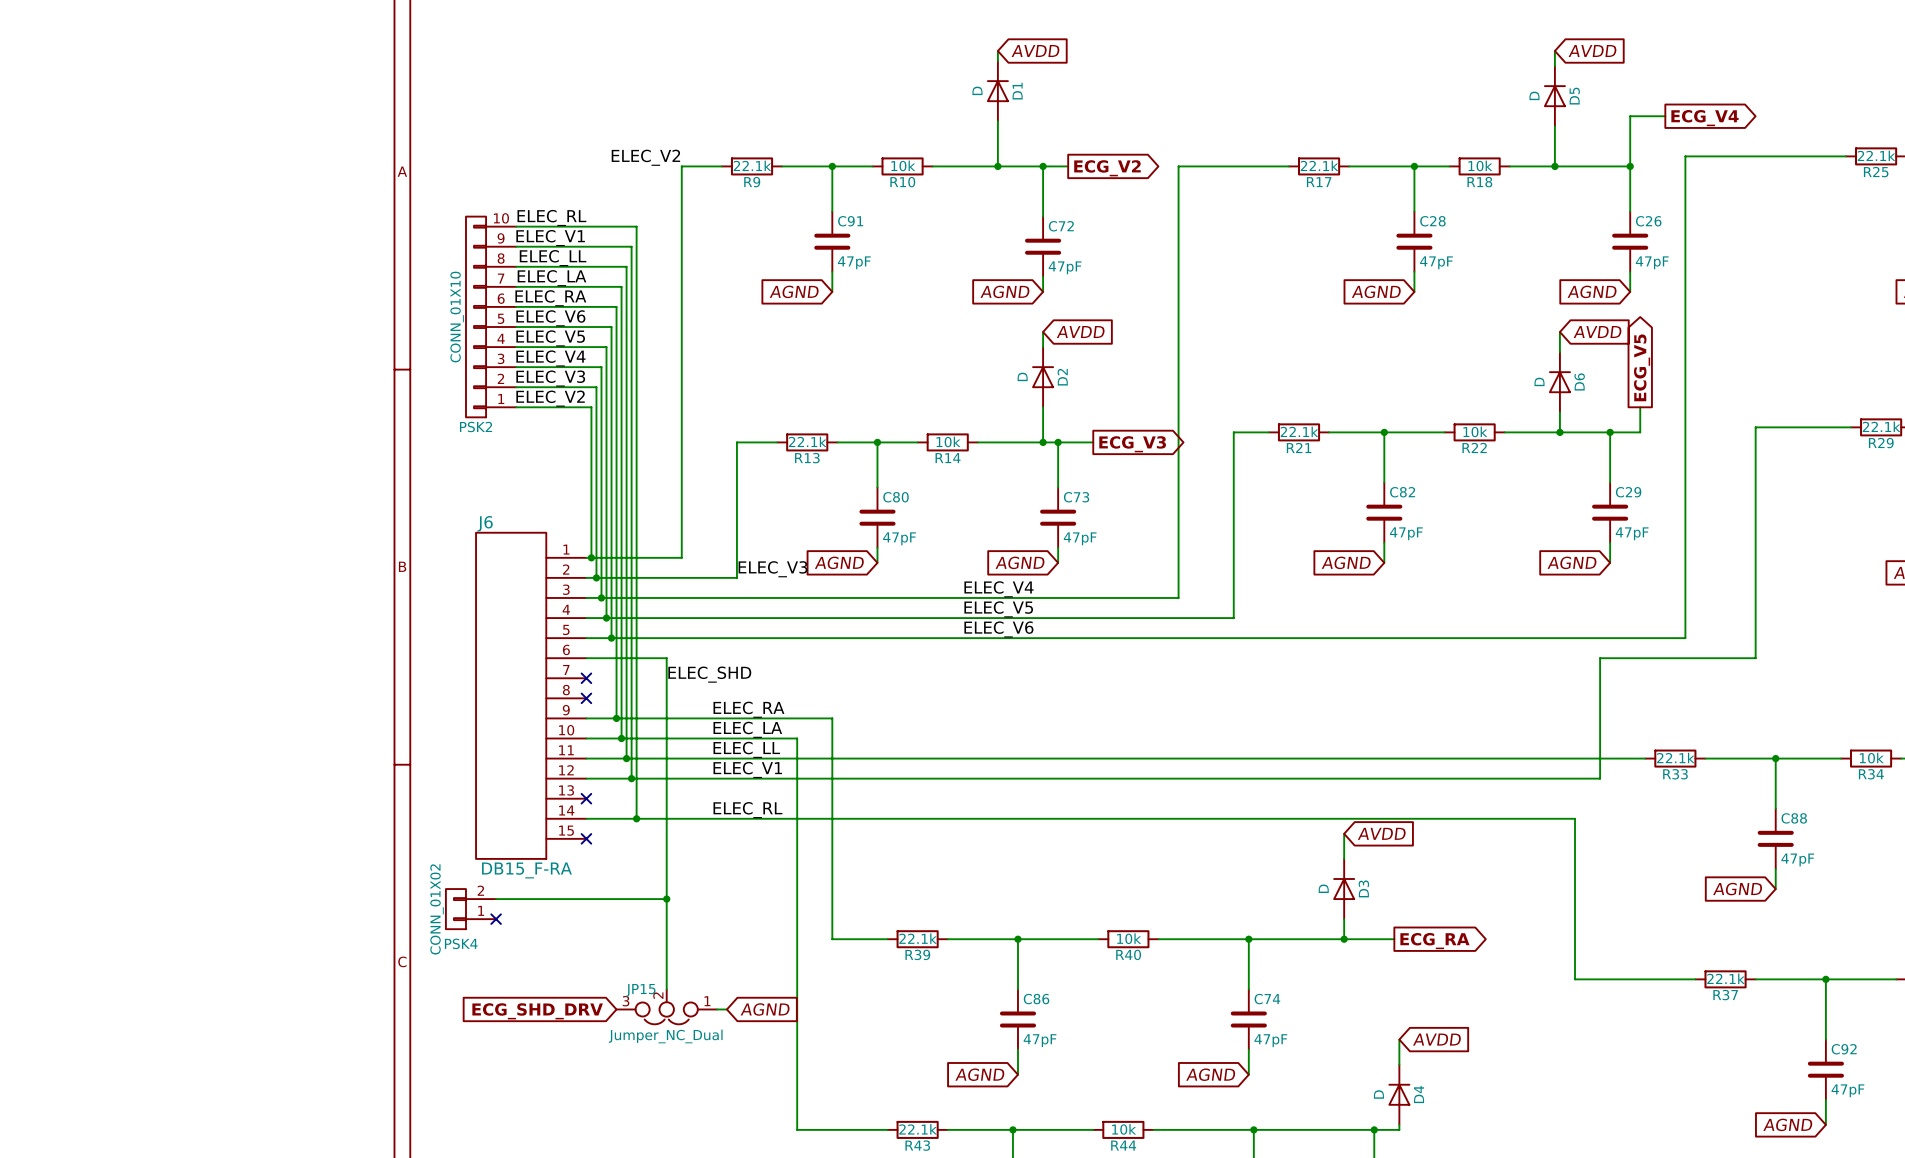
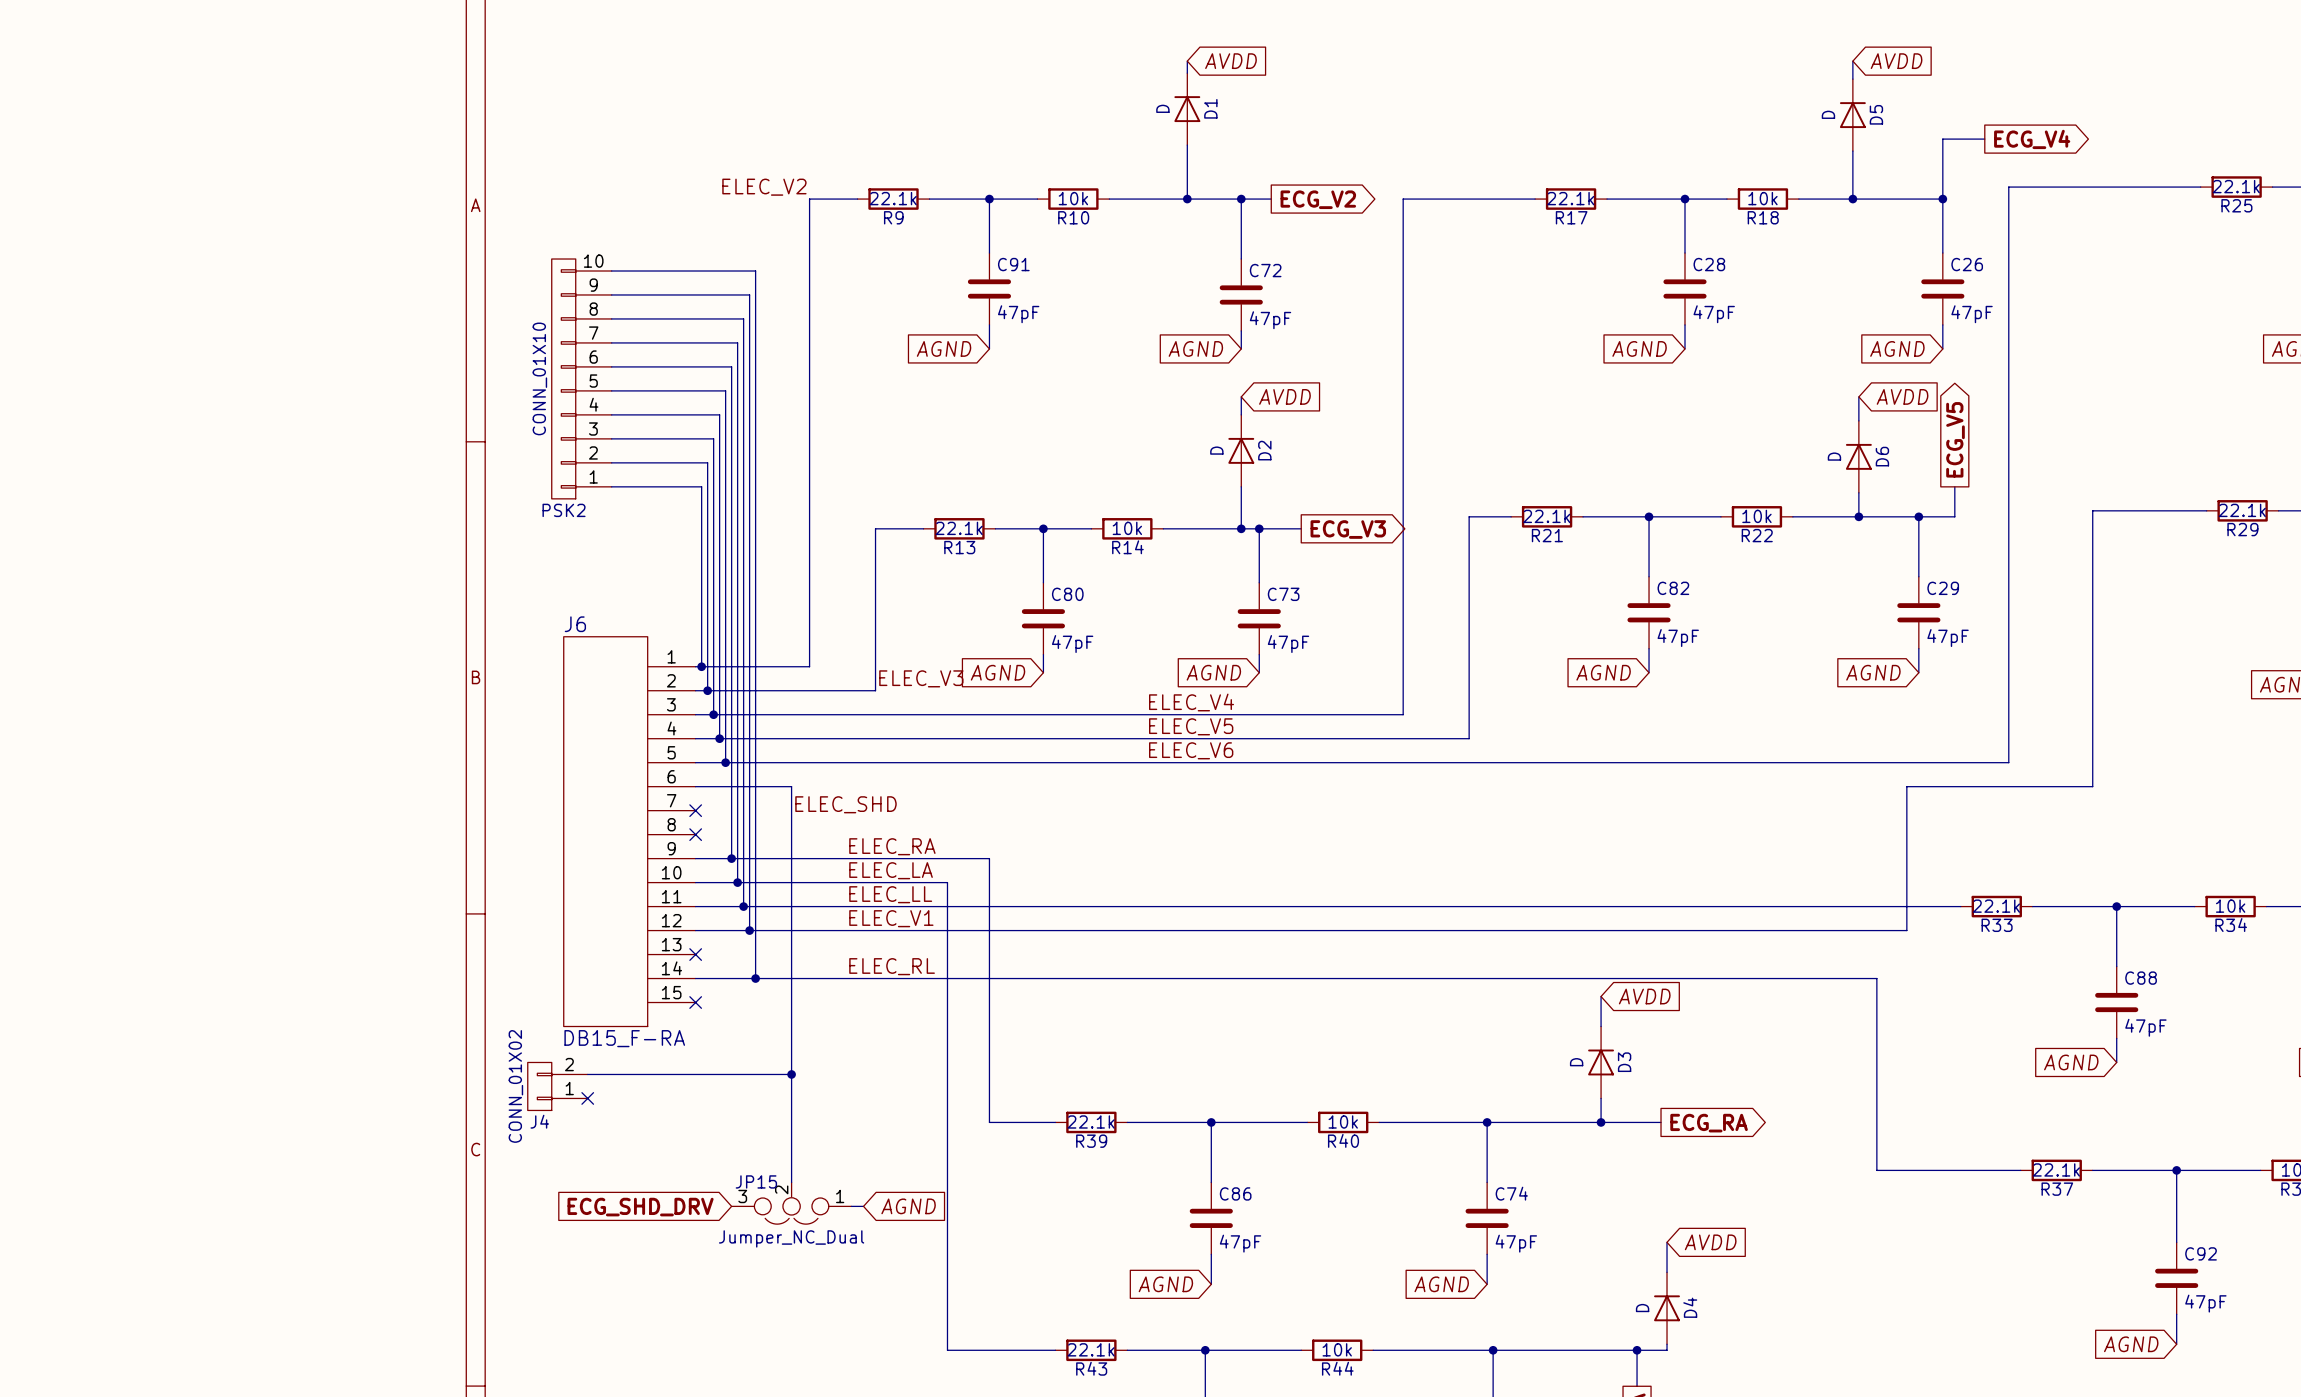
label: ELEC_RL (551, 217) -> none
label: ELEC_V1 (550, 238) -> none
label: ELEC_LL (553, 258) -> none
label: ELEC_LA (551, 278) -> none
label: ELEC_RA (550, 298) -> none
label: ELEC_V6 (550, 318) -> none
label: ELEC_V5 (550, 338) -> none
label: ELEC_V4 (550, 358) -> none
label: ELEC_V3 (550, 378) -> none
label: ELEC_V2 (550, 398) -> none
PSK4 name: PSK4 (461, 943) -> J4 (539, 1121)

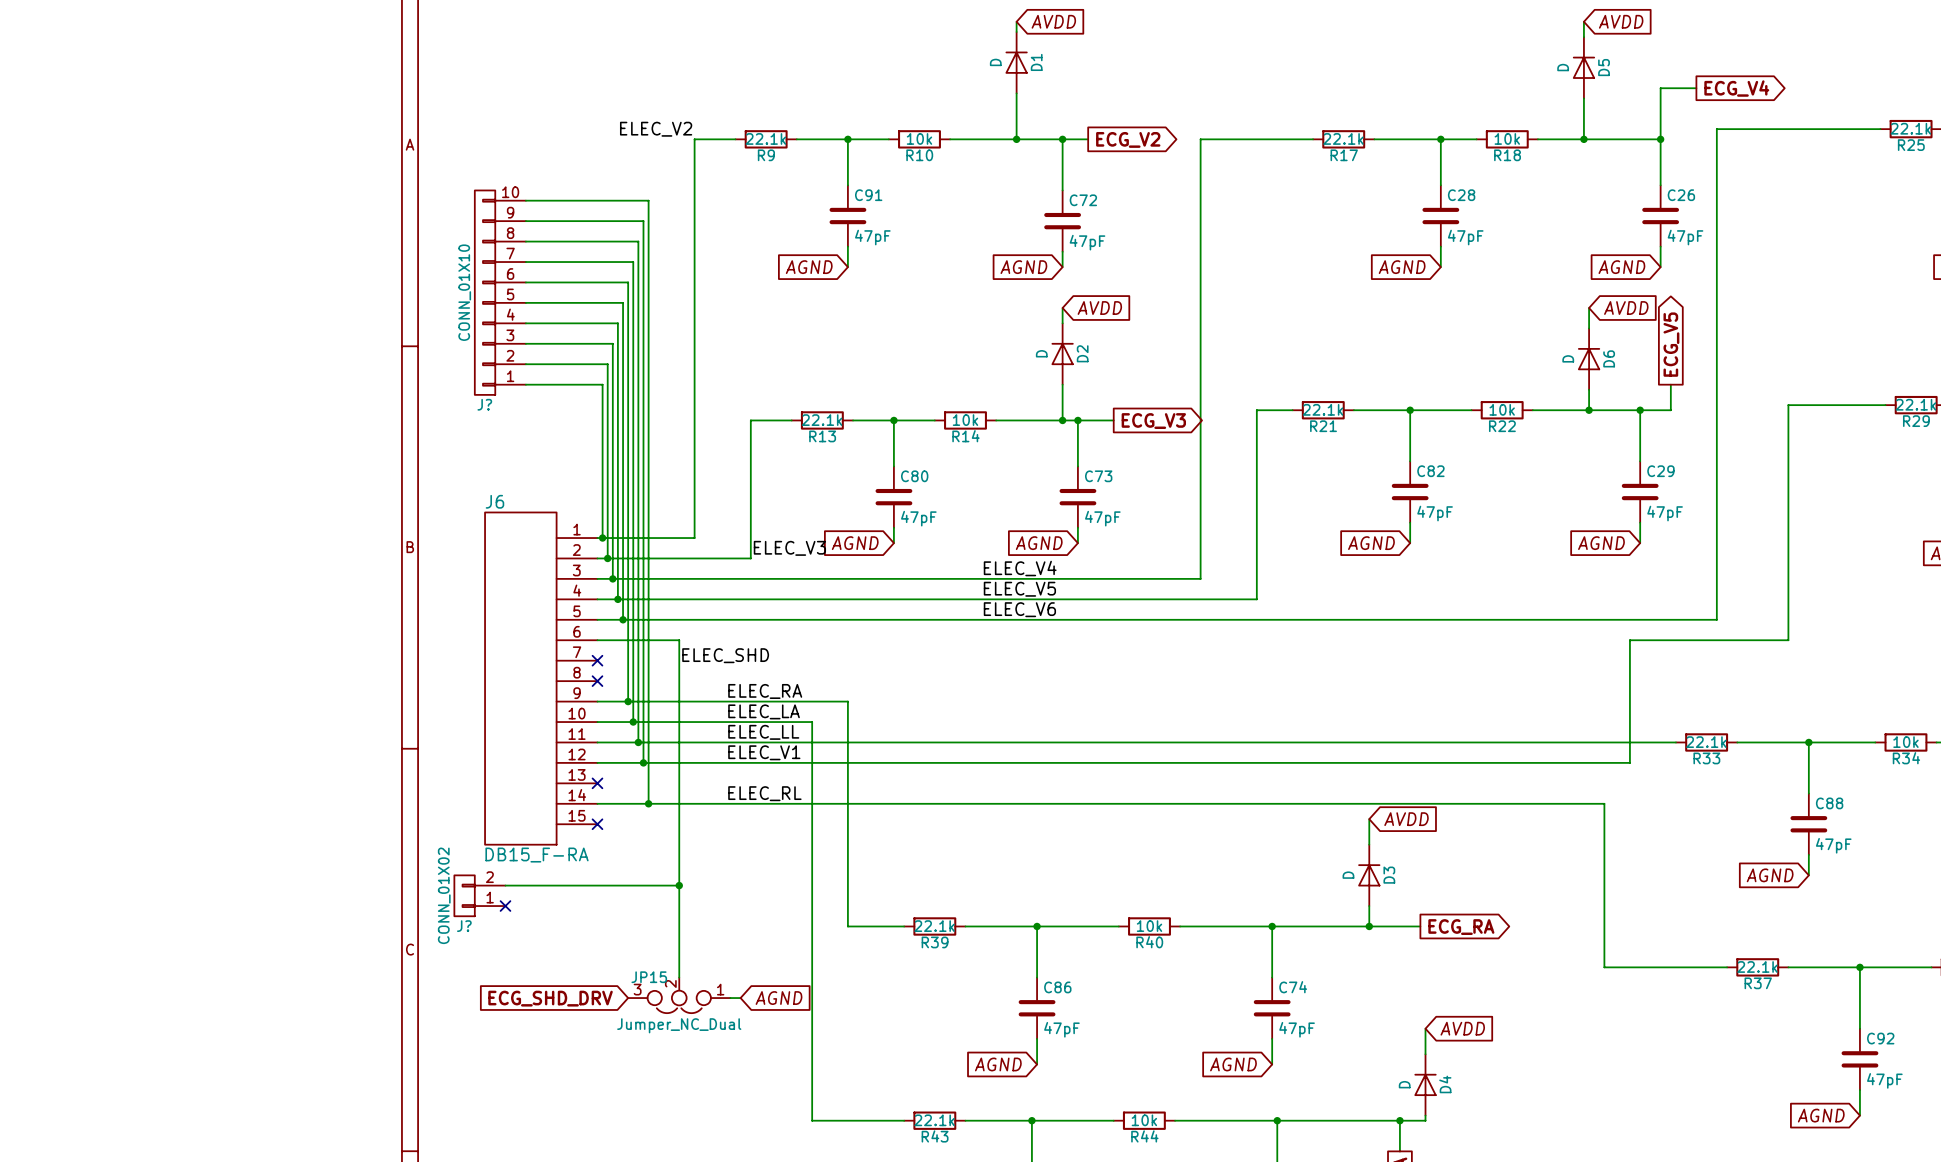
PSK2 name: PSK2 (564, 510) -> J? (484, 404)
J4 name: J4 (539, 1121) -> J? (464, 926)

